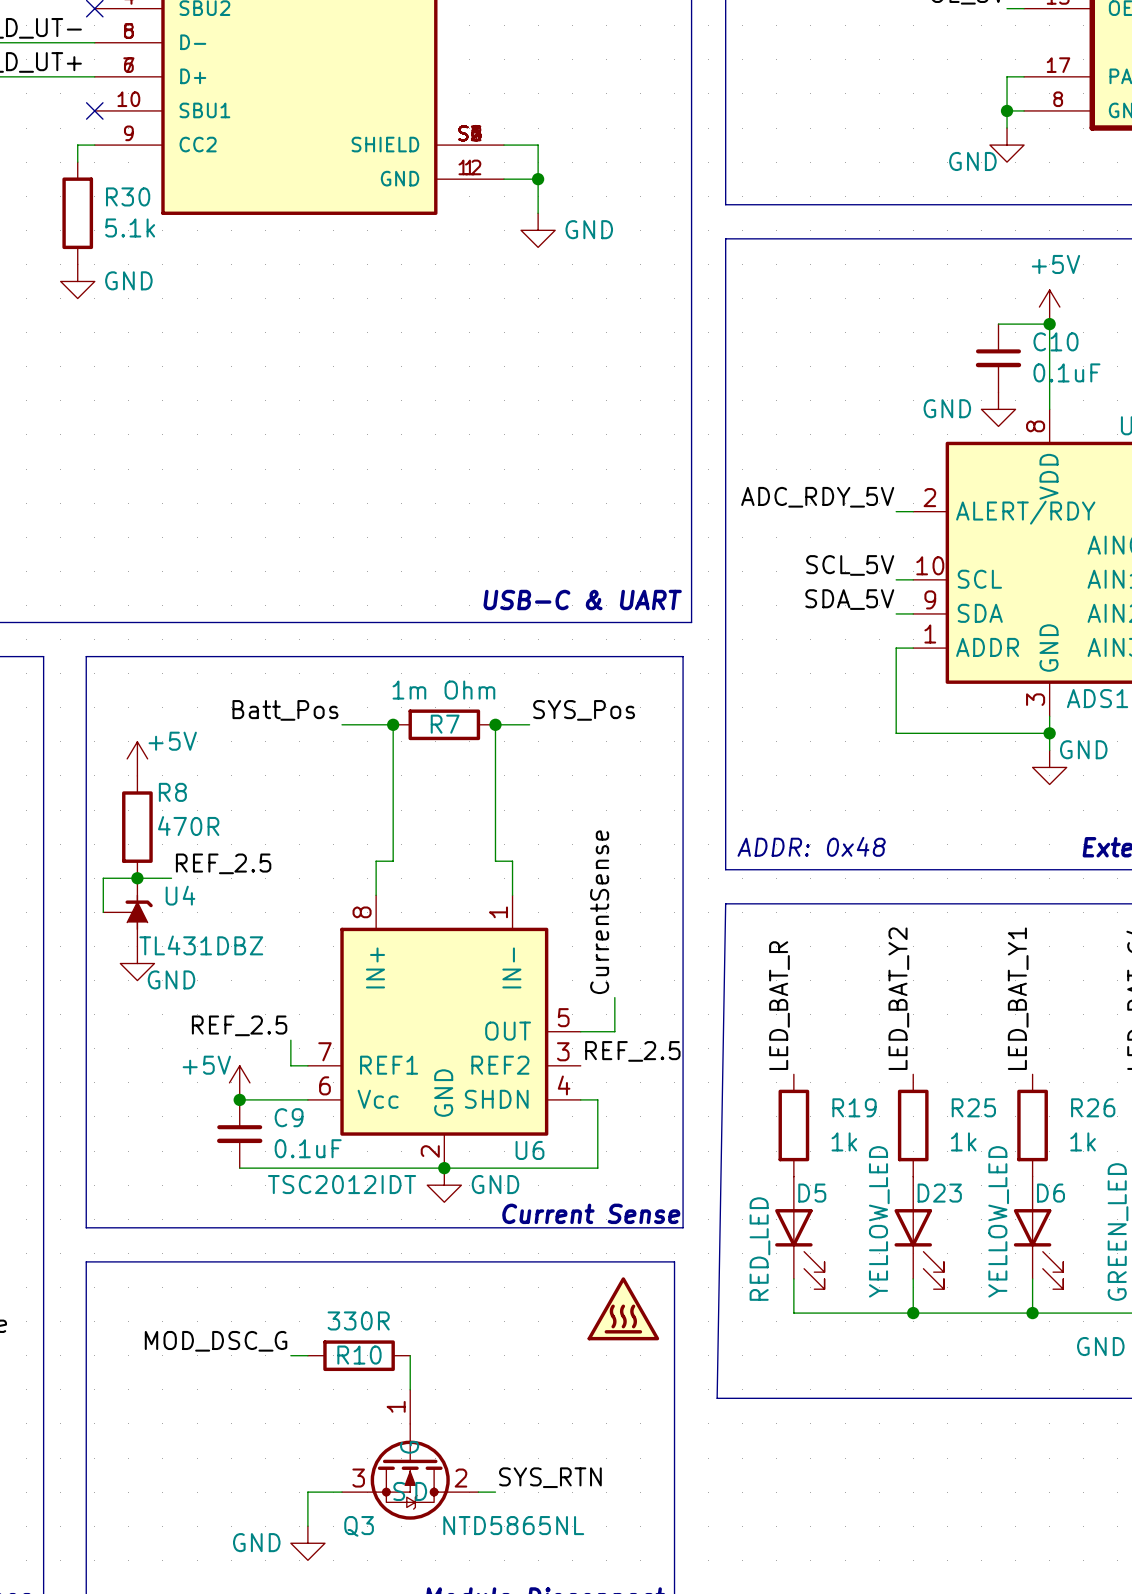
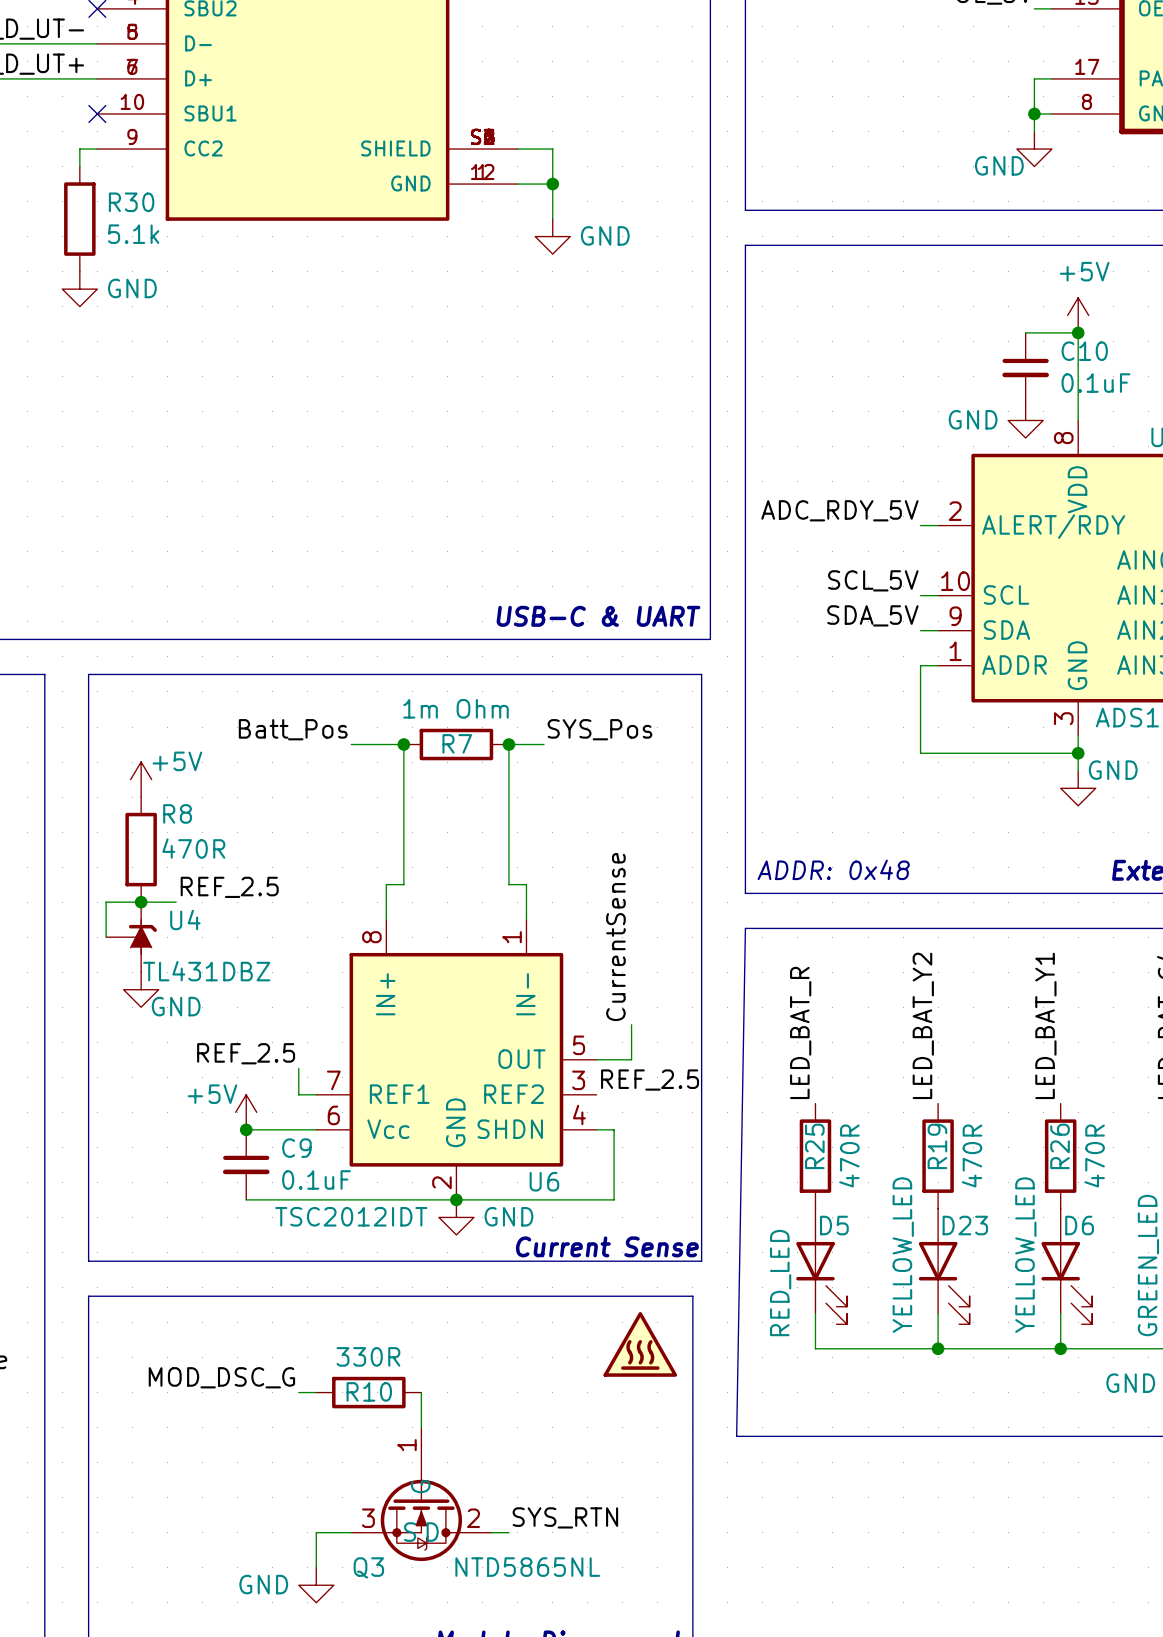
R19 name: R19 (854, 1107) -> R25 (814, 1146)
R25 name: R25 (973, 1107) -> R19 (937, 1146)
R26 name rotation: 0° (1093, 1107) -> 90° counterclockwise (1060, 1146)
R26 name position: R26 (1093, 1107) -> R26 (1060, 1146)
R19 value: 1k (844, 1141) -> 470R (849, 1155)
R25 value: 1k (963, 1141) -> 470R (972, 1155)
R26 value: 1k (1083, 1141) -> 470R (1094, 1155)

